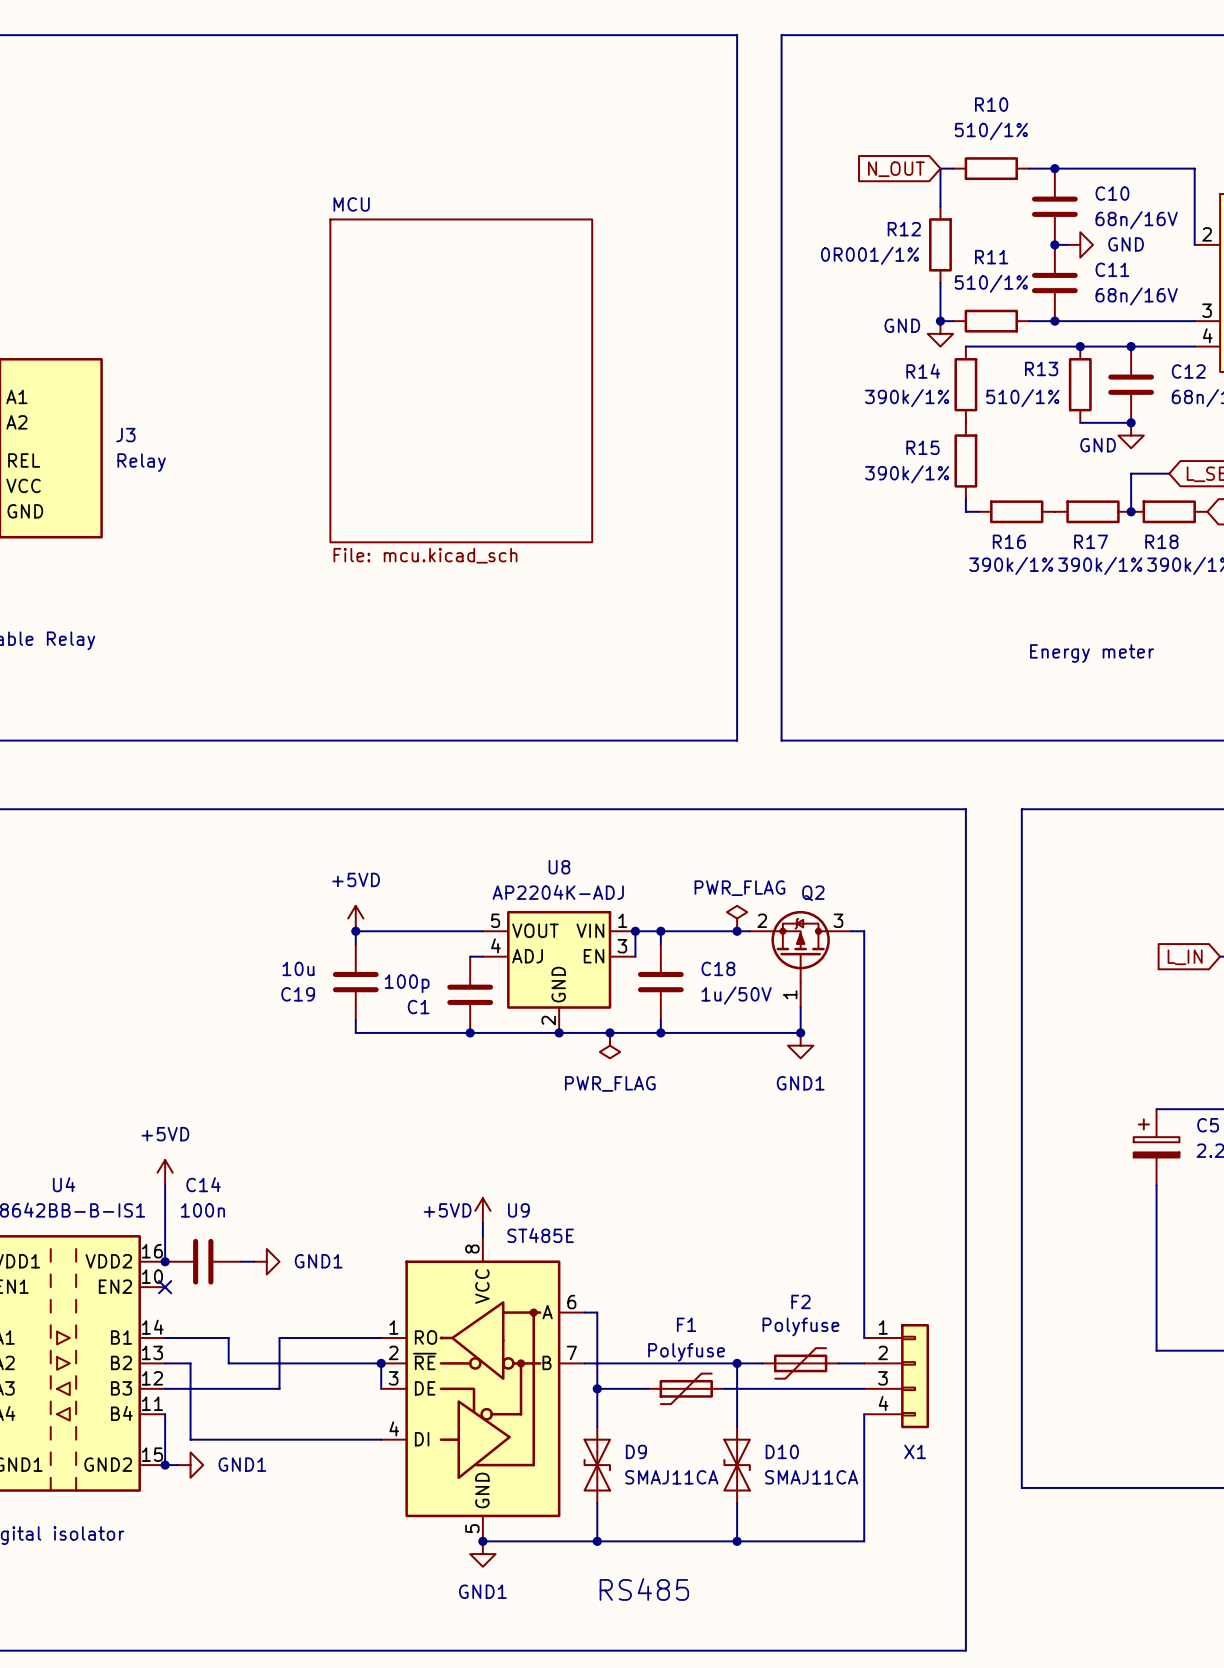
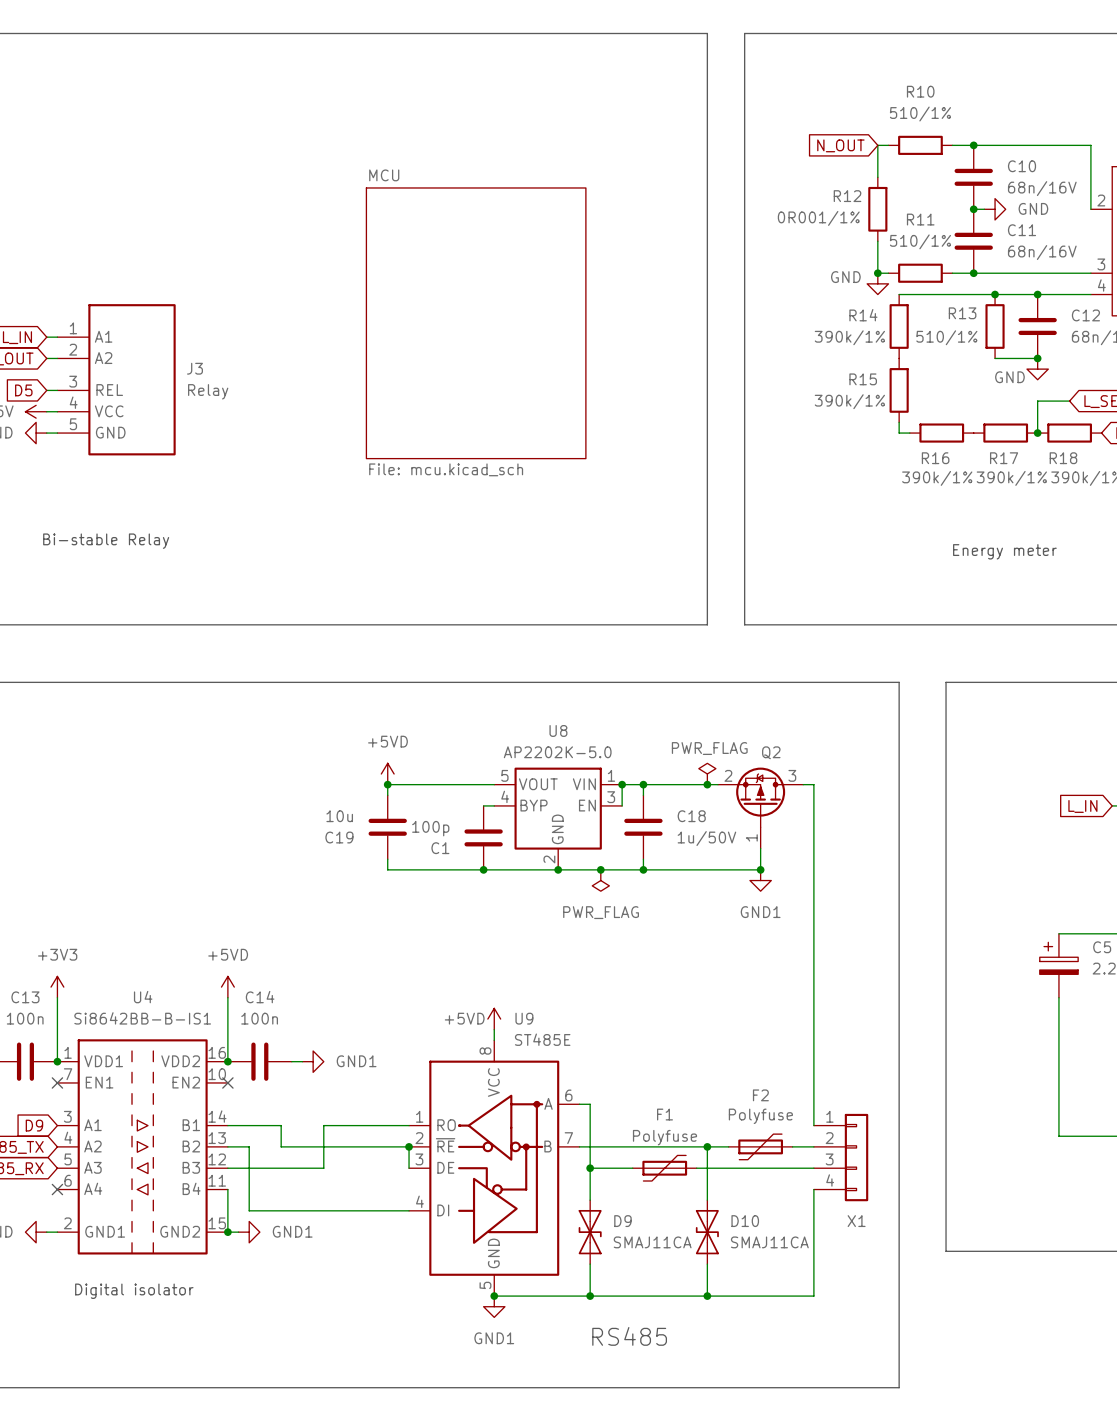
U8 value: AP2204K-ADJ (558, 892) -> AP2202K-5.0 (557, 752)
U8 pin name: ADJ (527, 956) -> BYP (534, 805)

